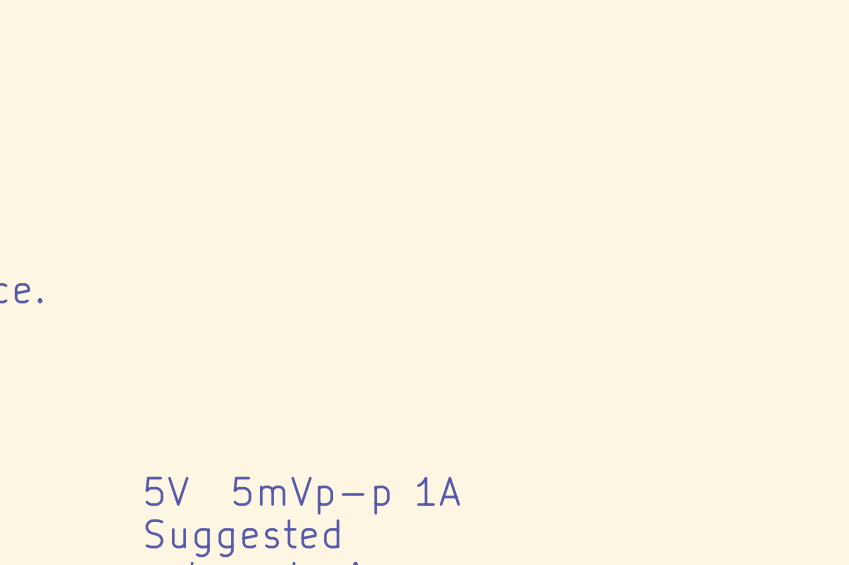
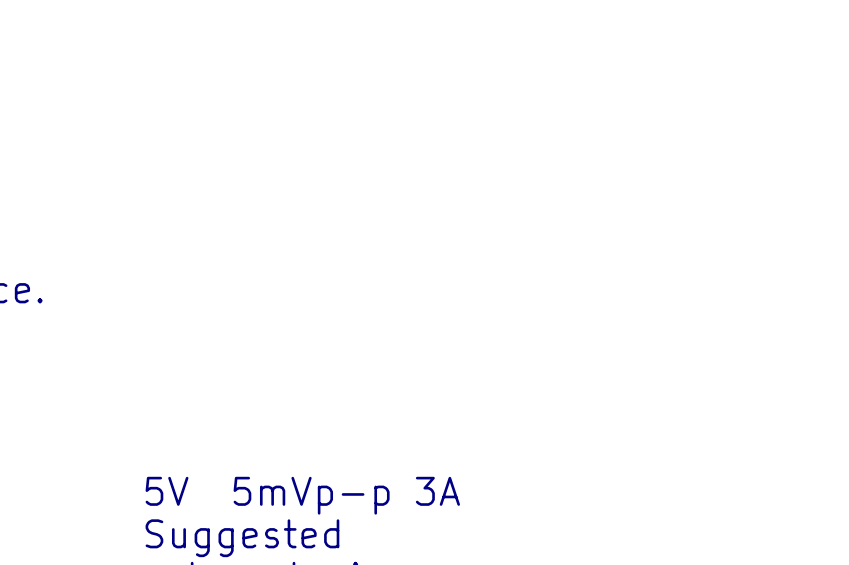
text: 5V 5mVp-p 1A (302, 495) -> 5V 5mVp-p 3A (302, 495)

